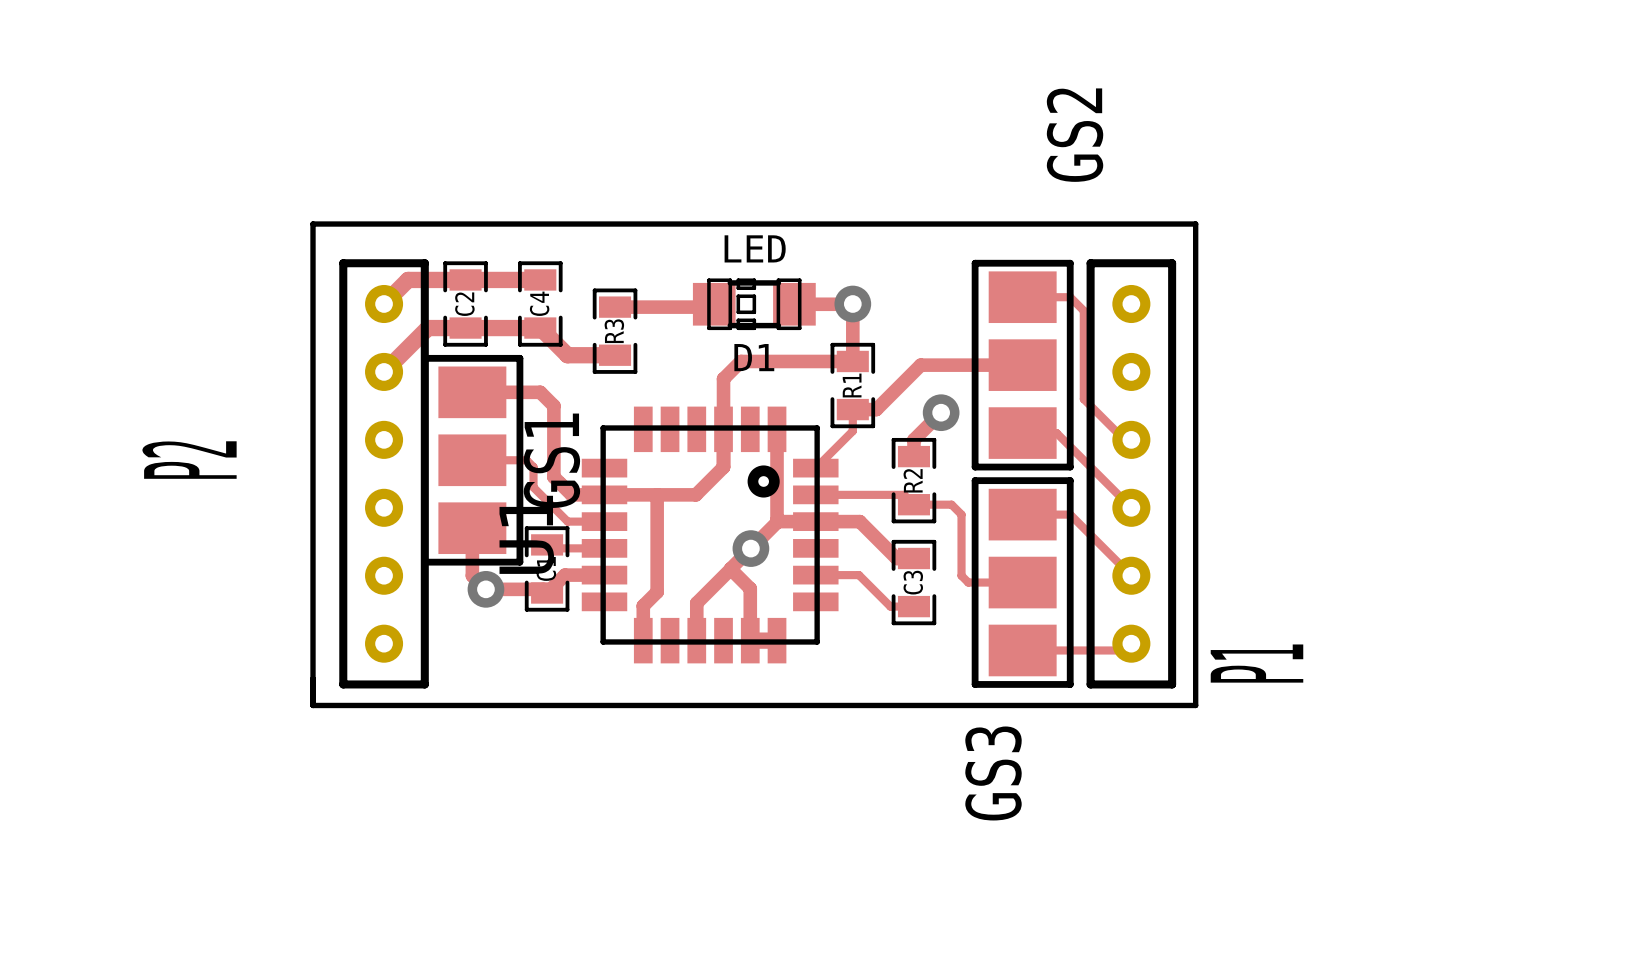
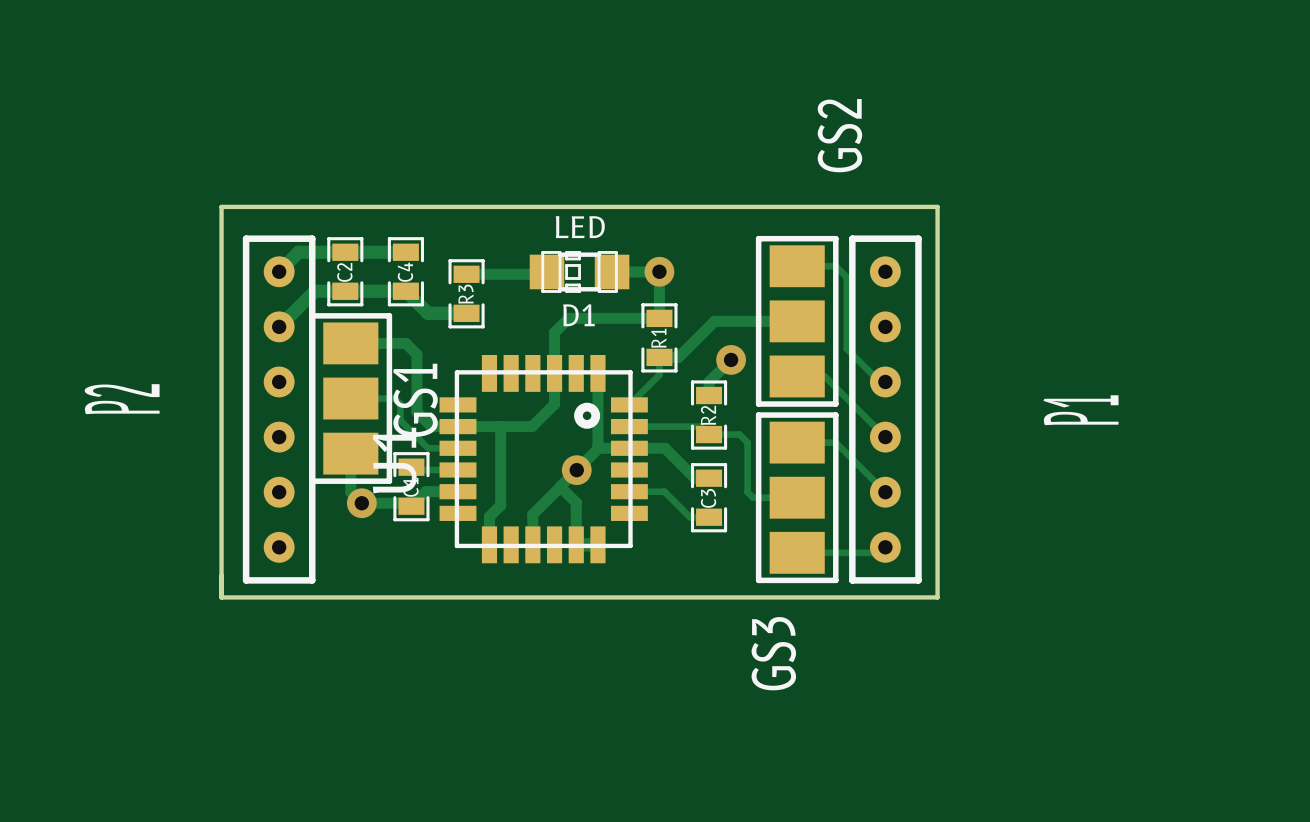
P1 name position: P1 (1256, 663) -> P1 (1081, 410)

